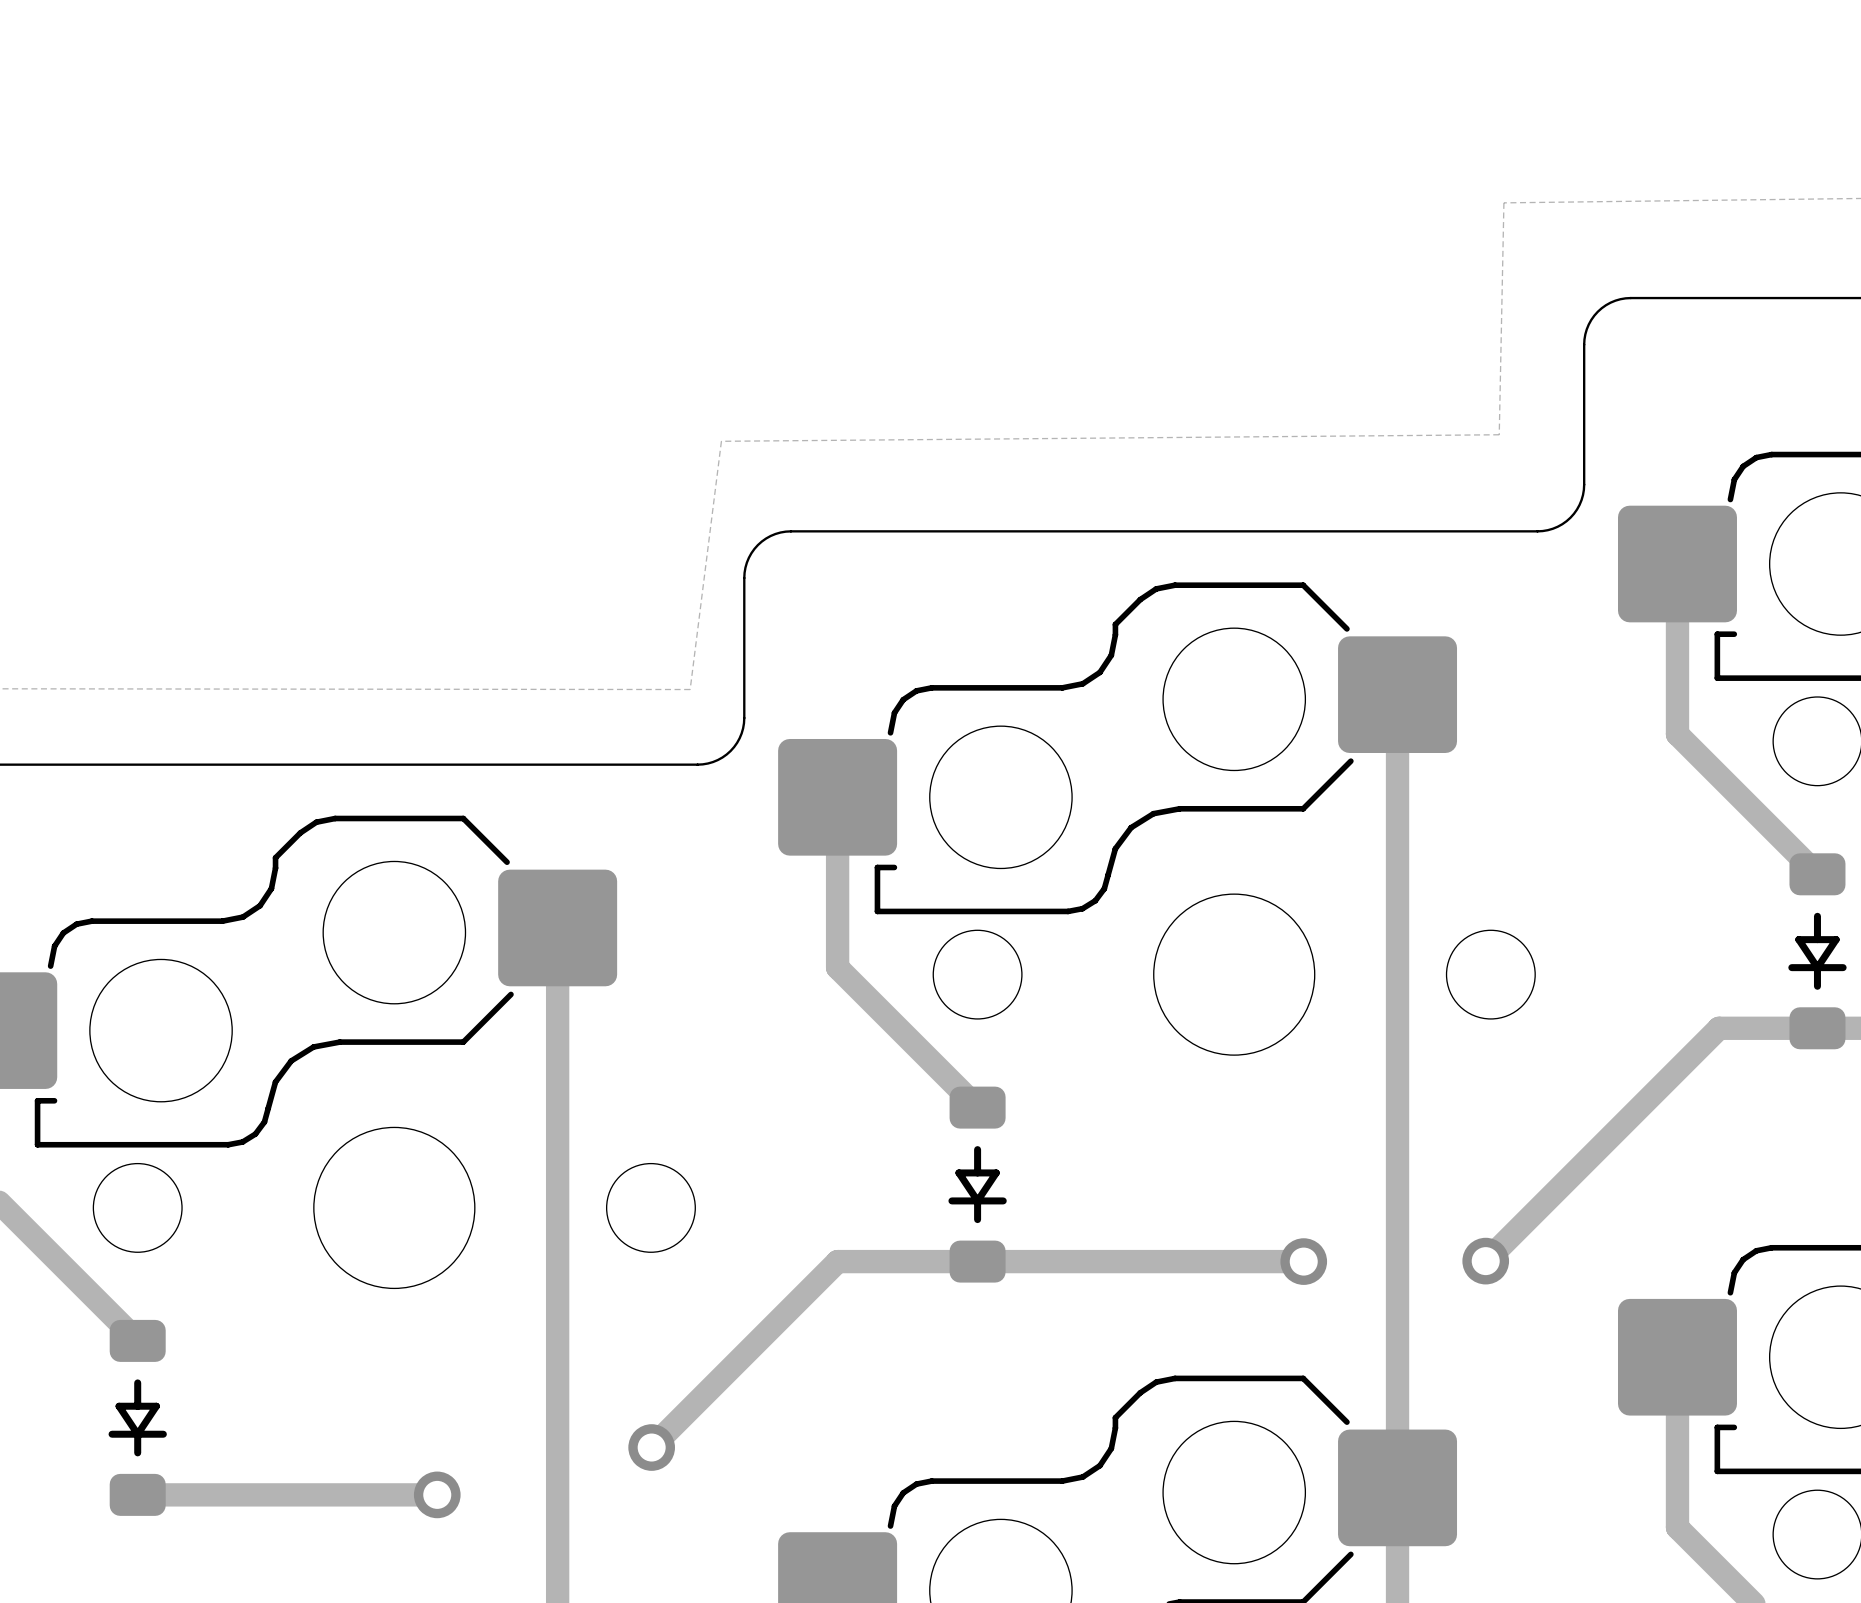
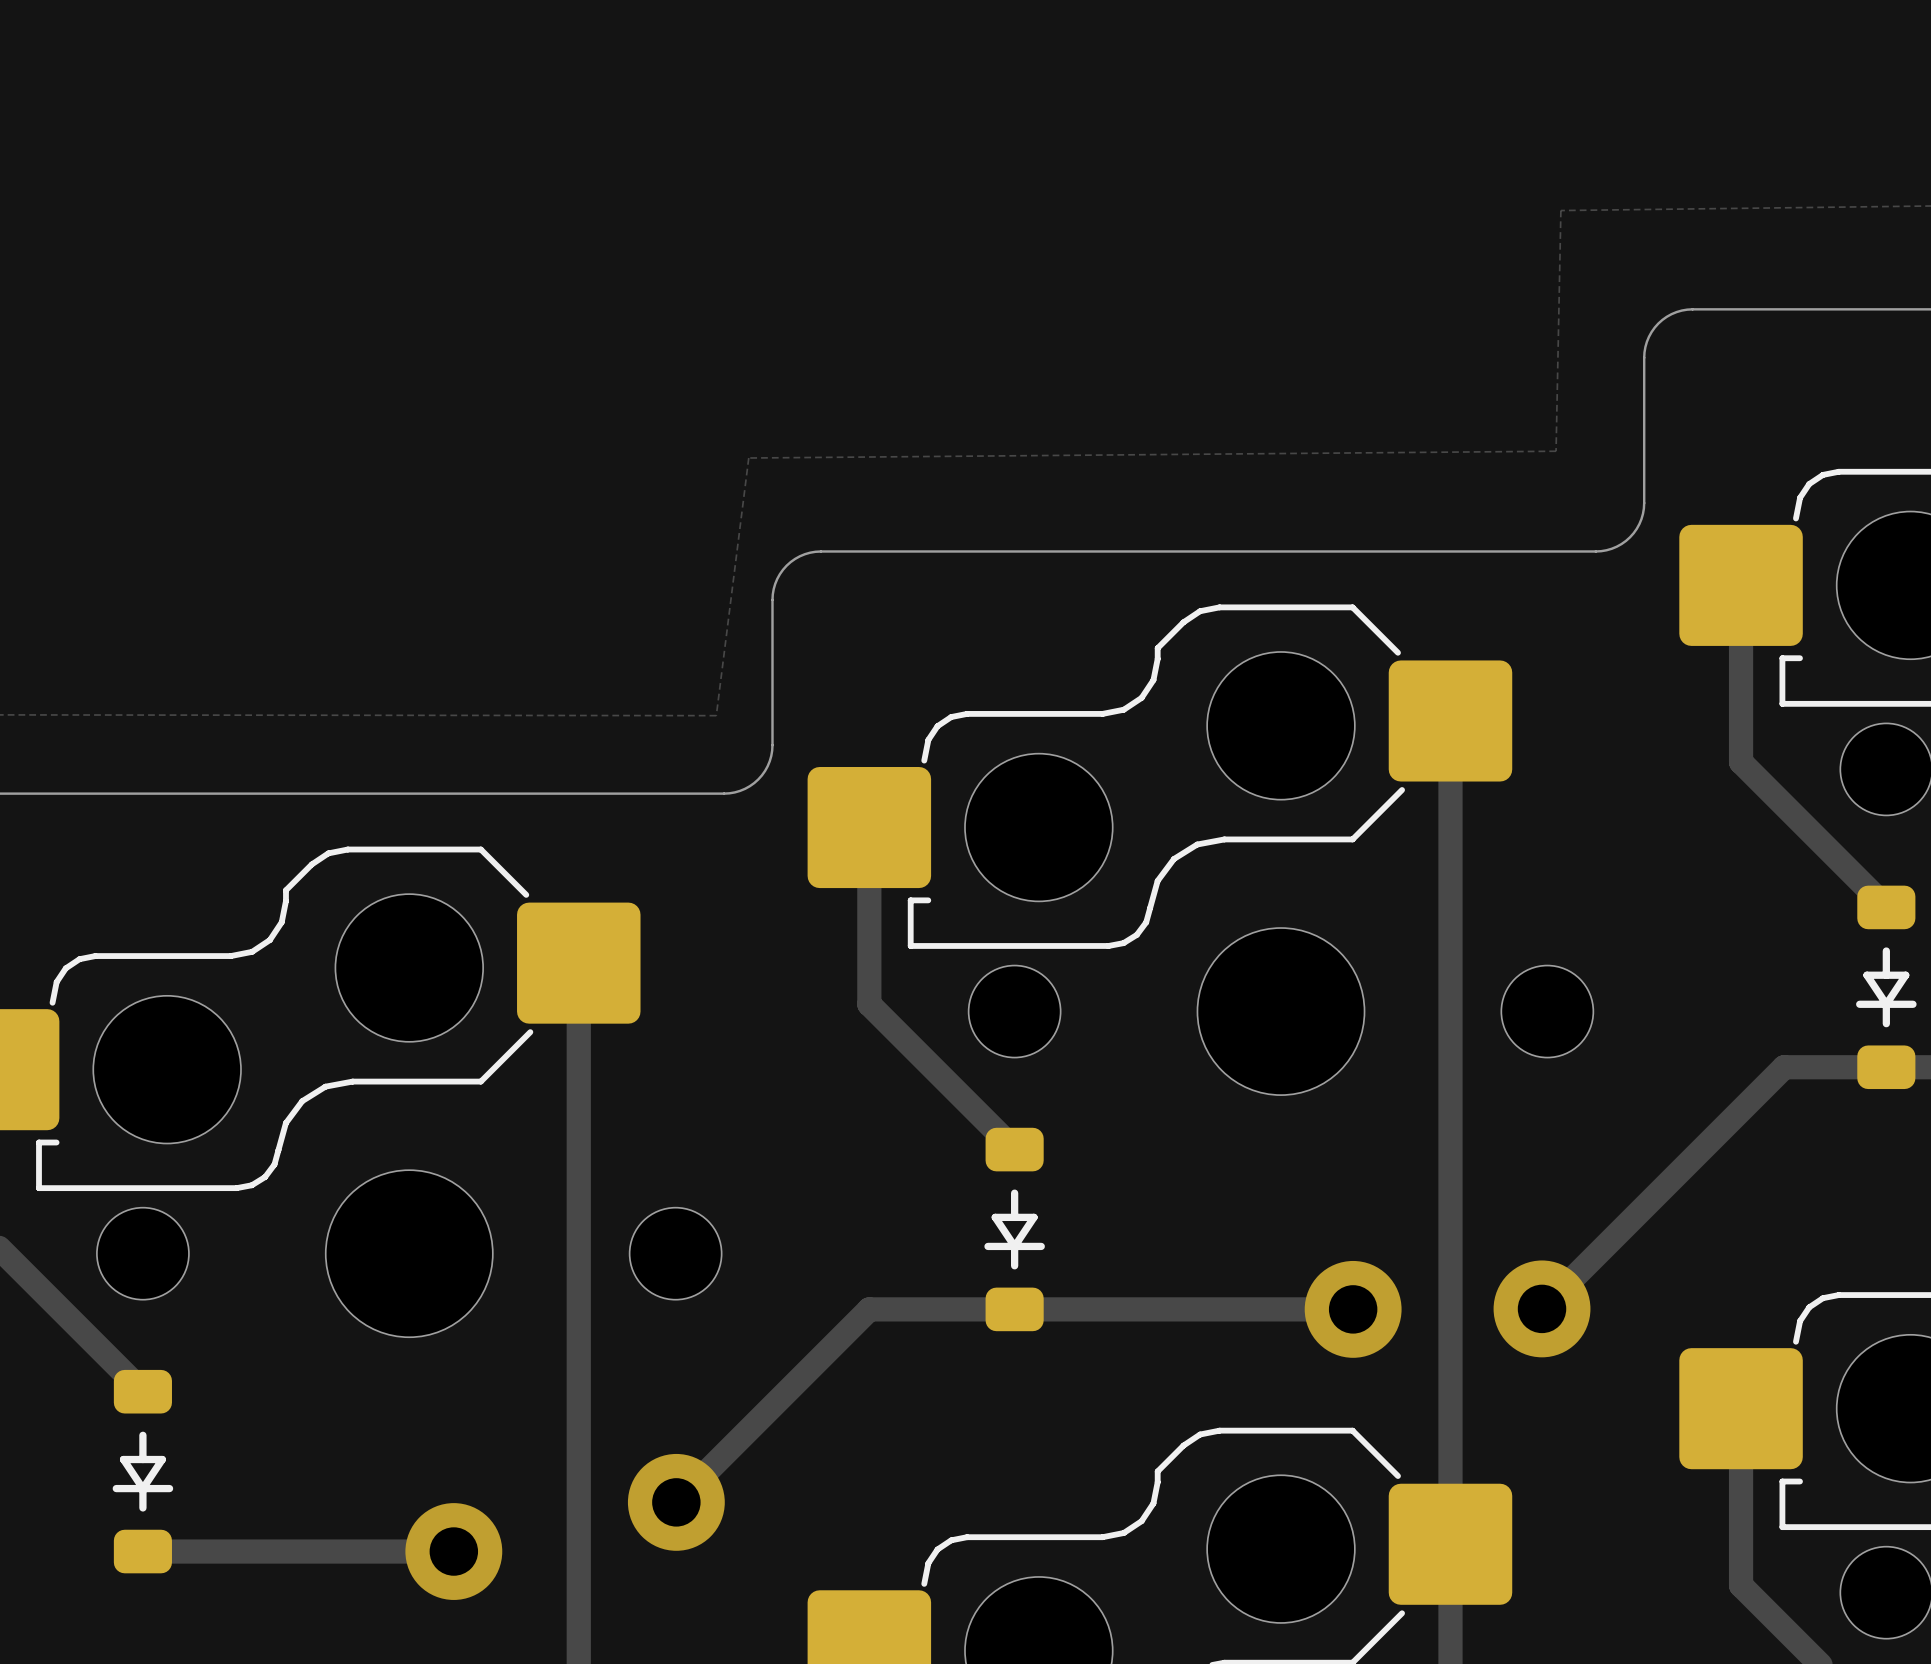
via size: [1462, 1237, 1510, 1285] -> [1493, 1260, 1591, 1358]
via size: [1280, 1238, 1328, 1285] -> [1304, 1260, 1402, 1358]
via size: [628, 1424, 675, 1471] -> [627, 1453, 725, 1551]
via size: [413, 1471, 461, 1519] -> [405, 1503, 503, 1600]

